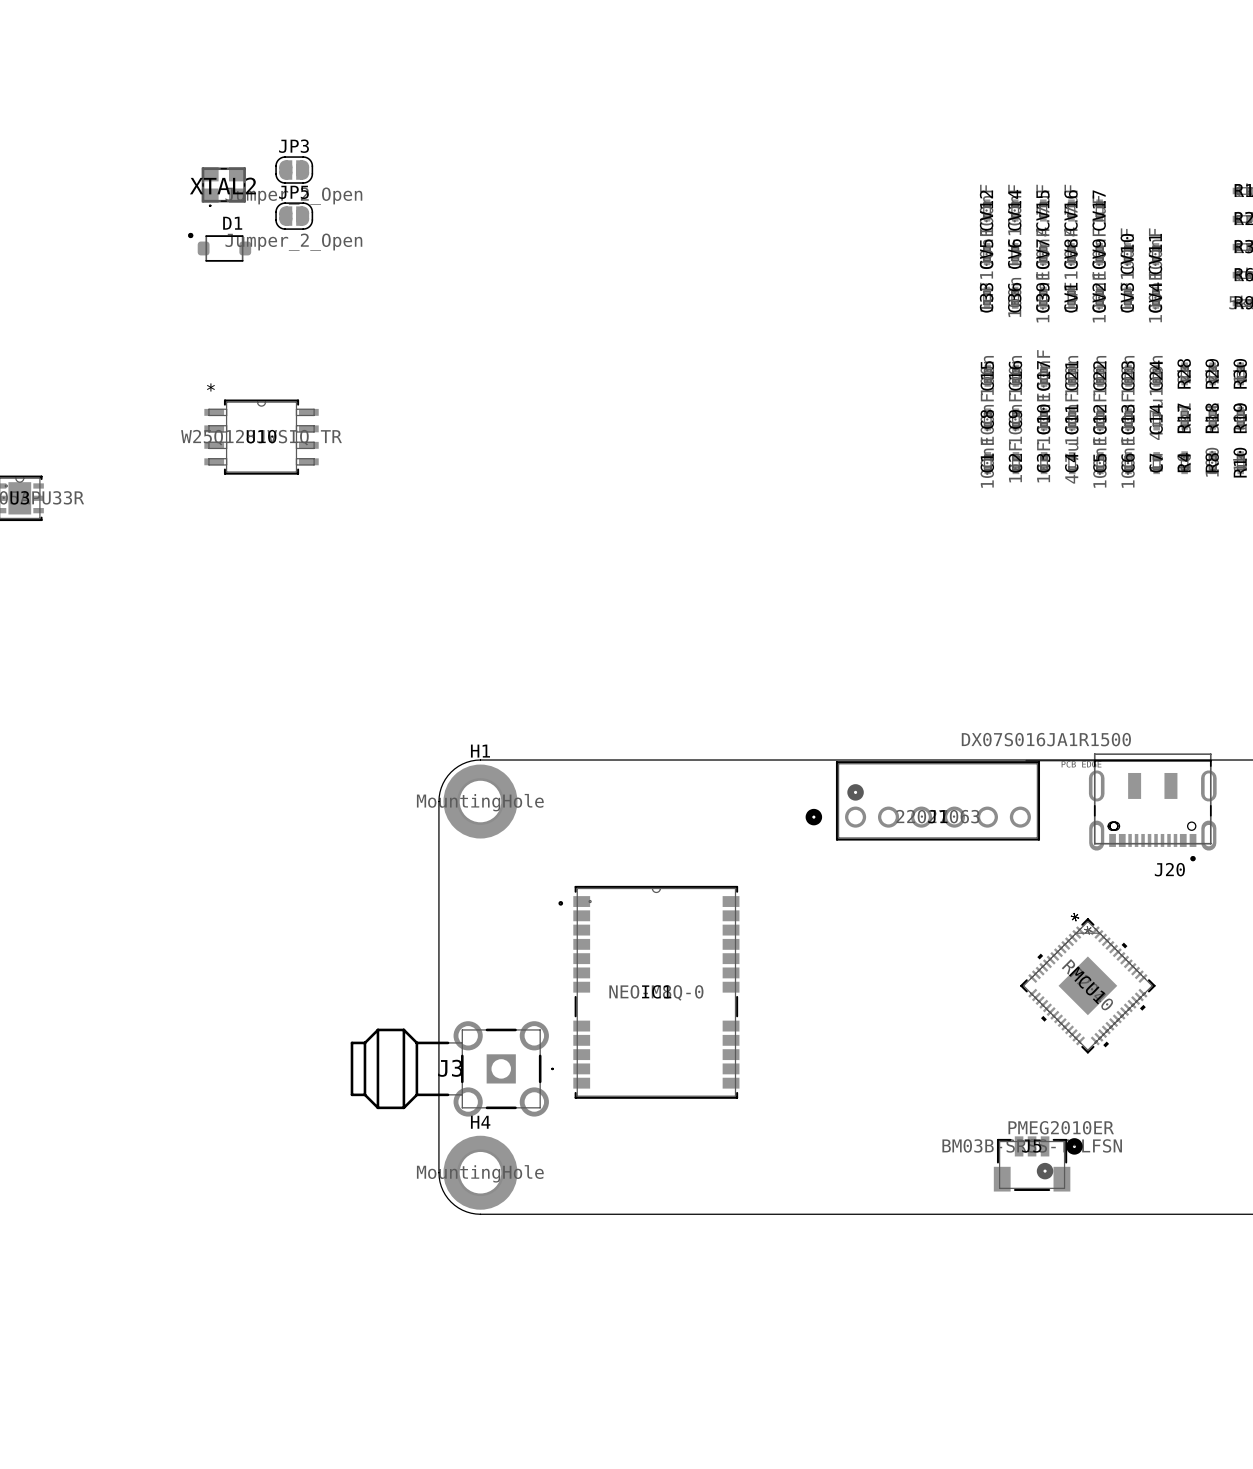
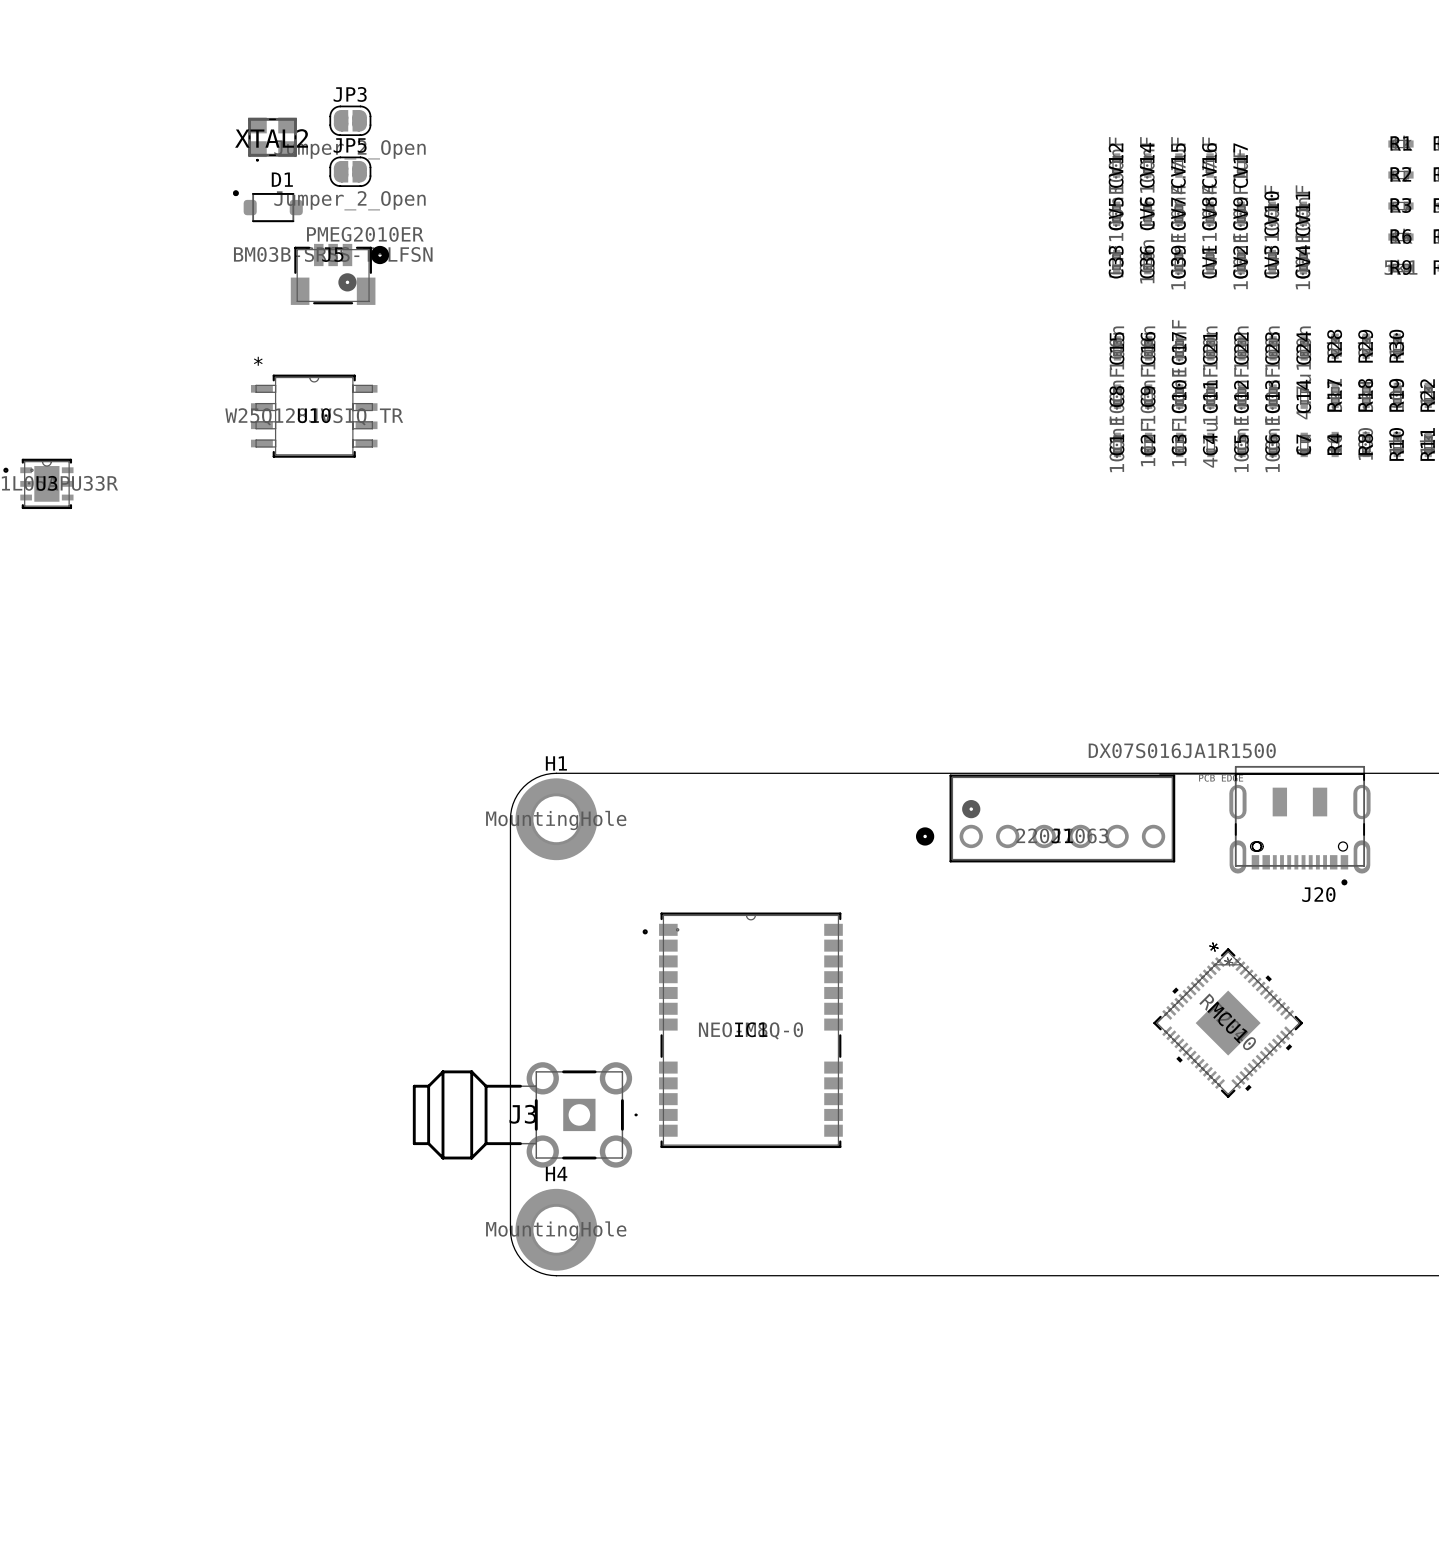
D1 value position: PMEG2010ER (1061, 1127) -> PMEG2010ER (365, 234)
J5 position: (1038, 1163) -> (339, 274)

